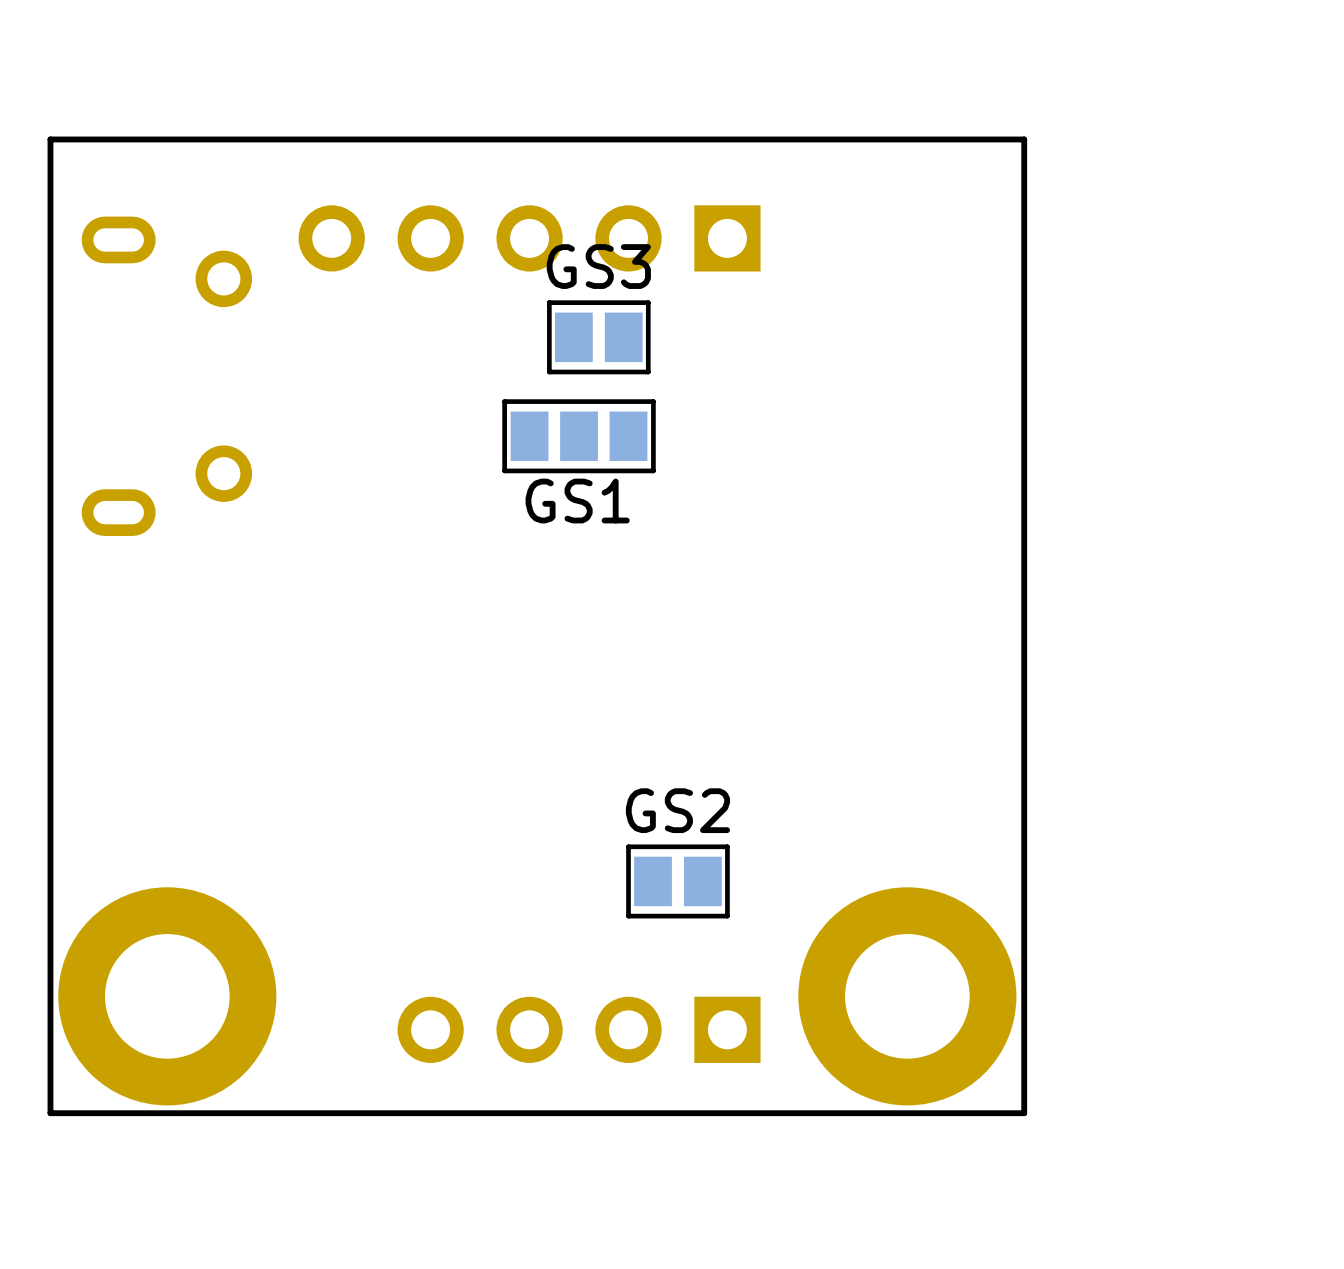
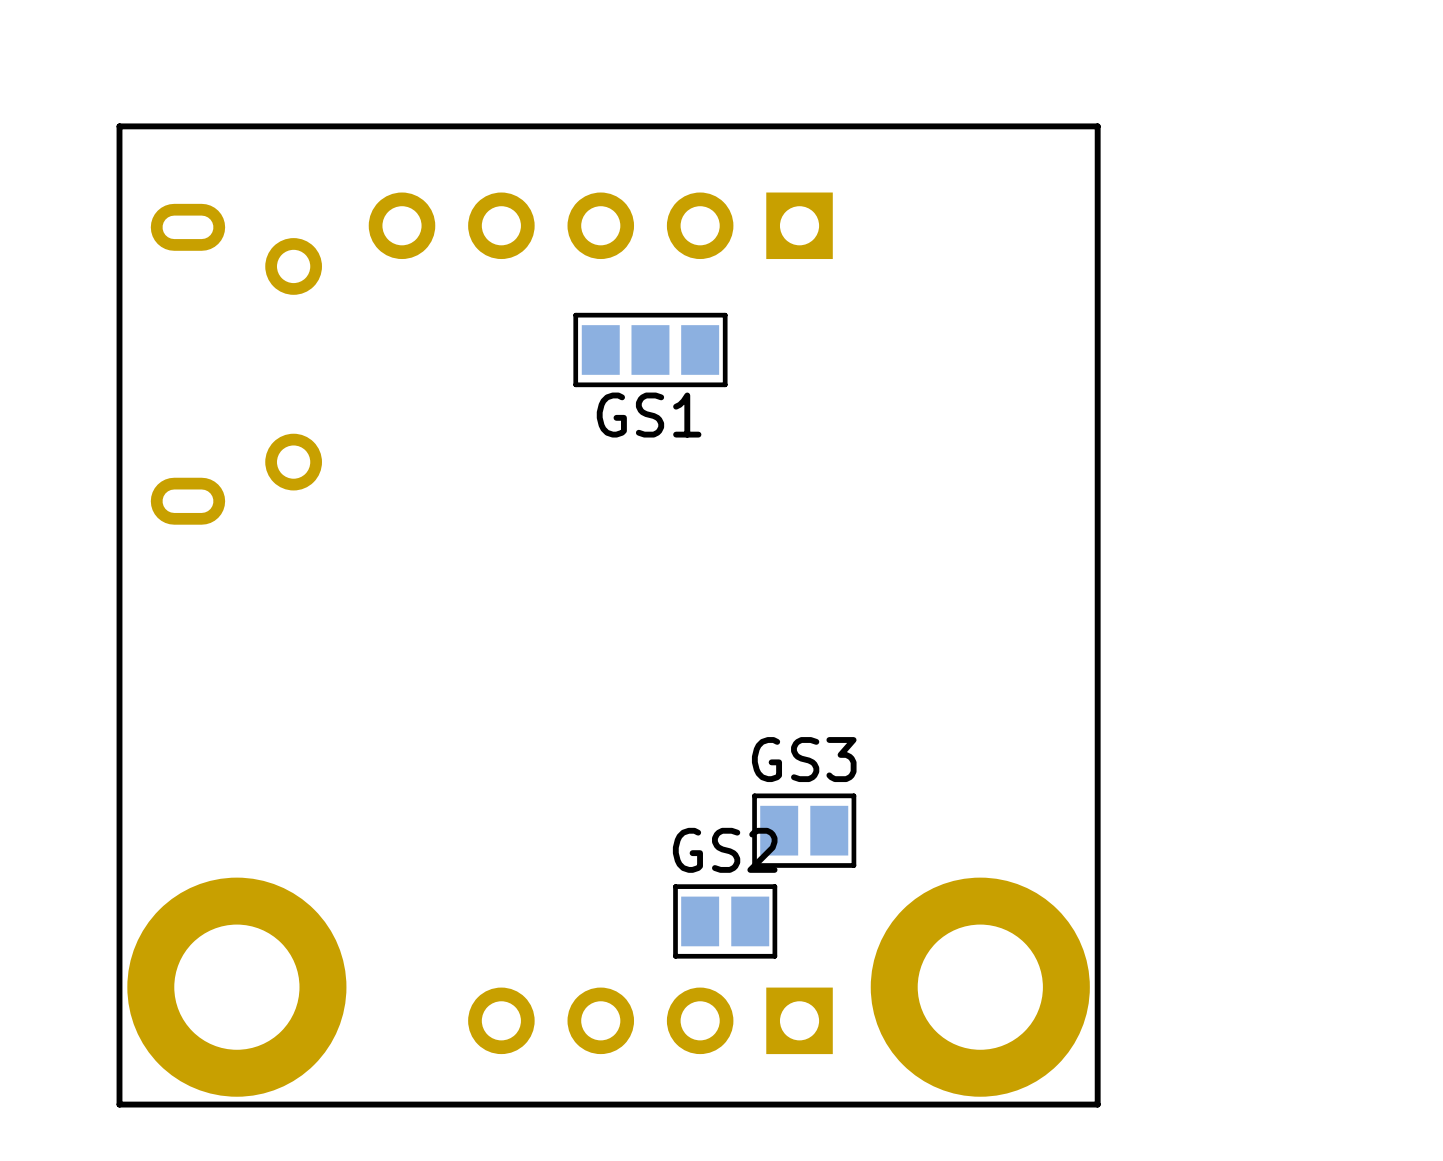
GS3 position: (598, 337) -> (804, 830)
GS1 position: (579, 436) -> (650, 349)
GS2 position: (677, 881) -> (725, 921)

